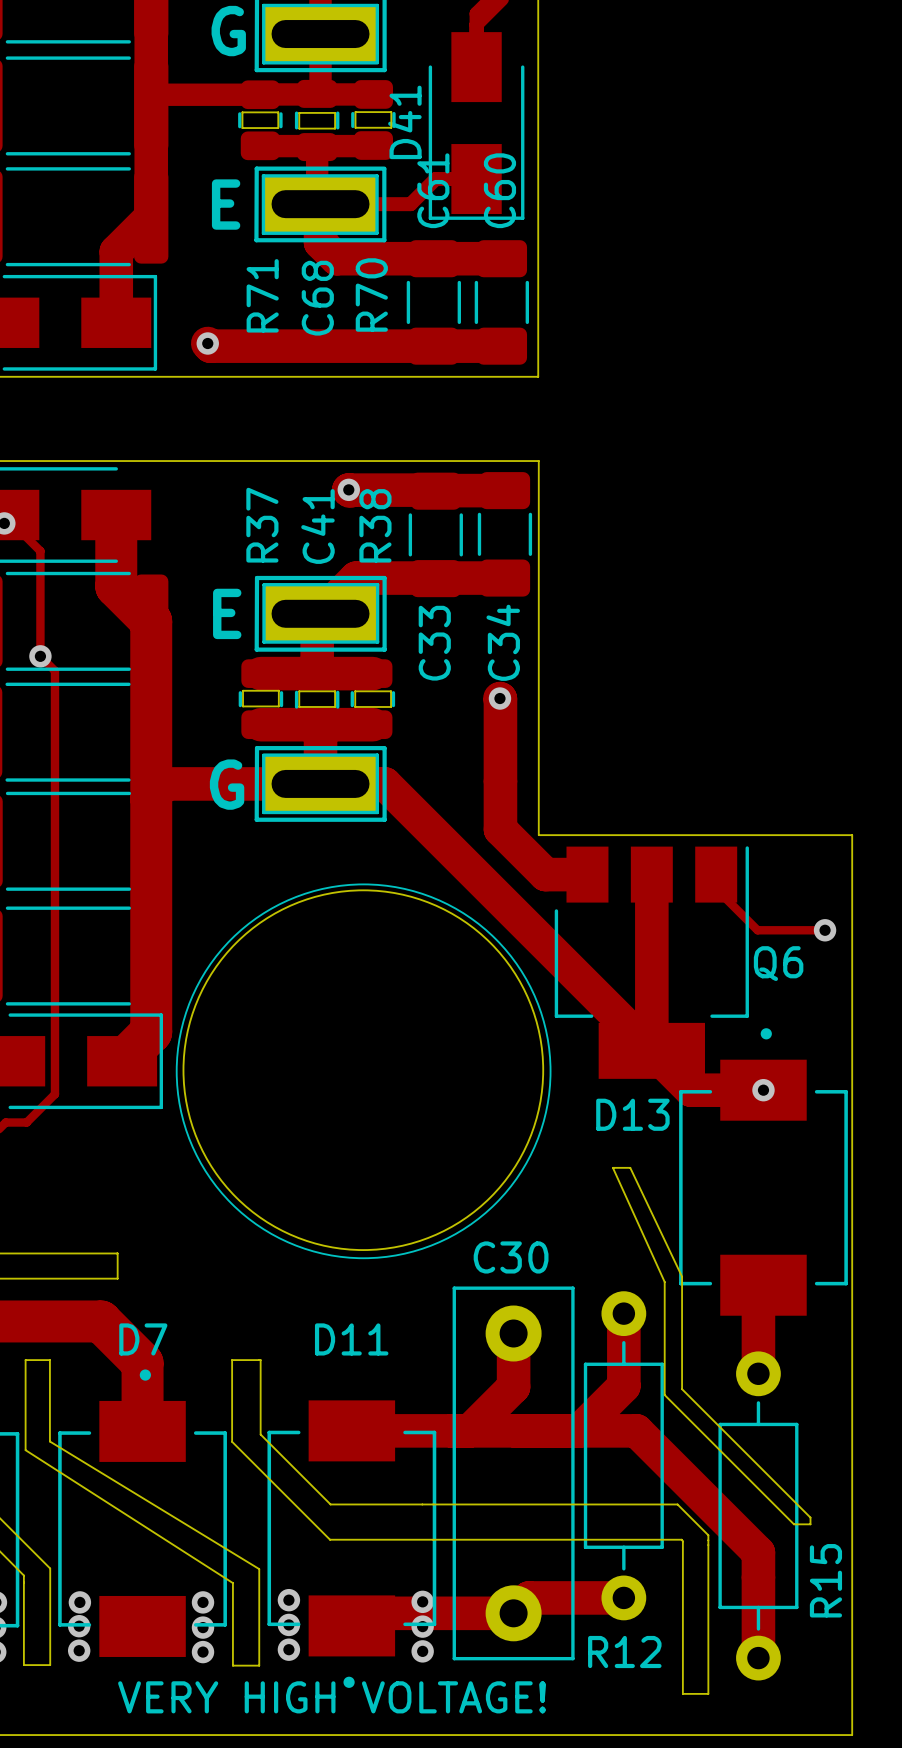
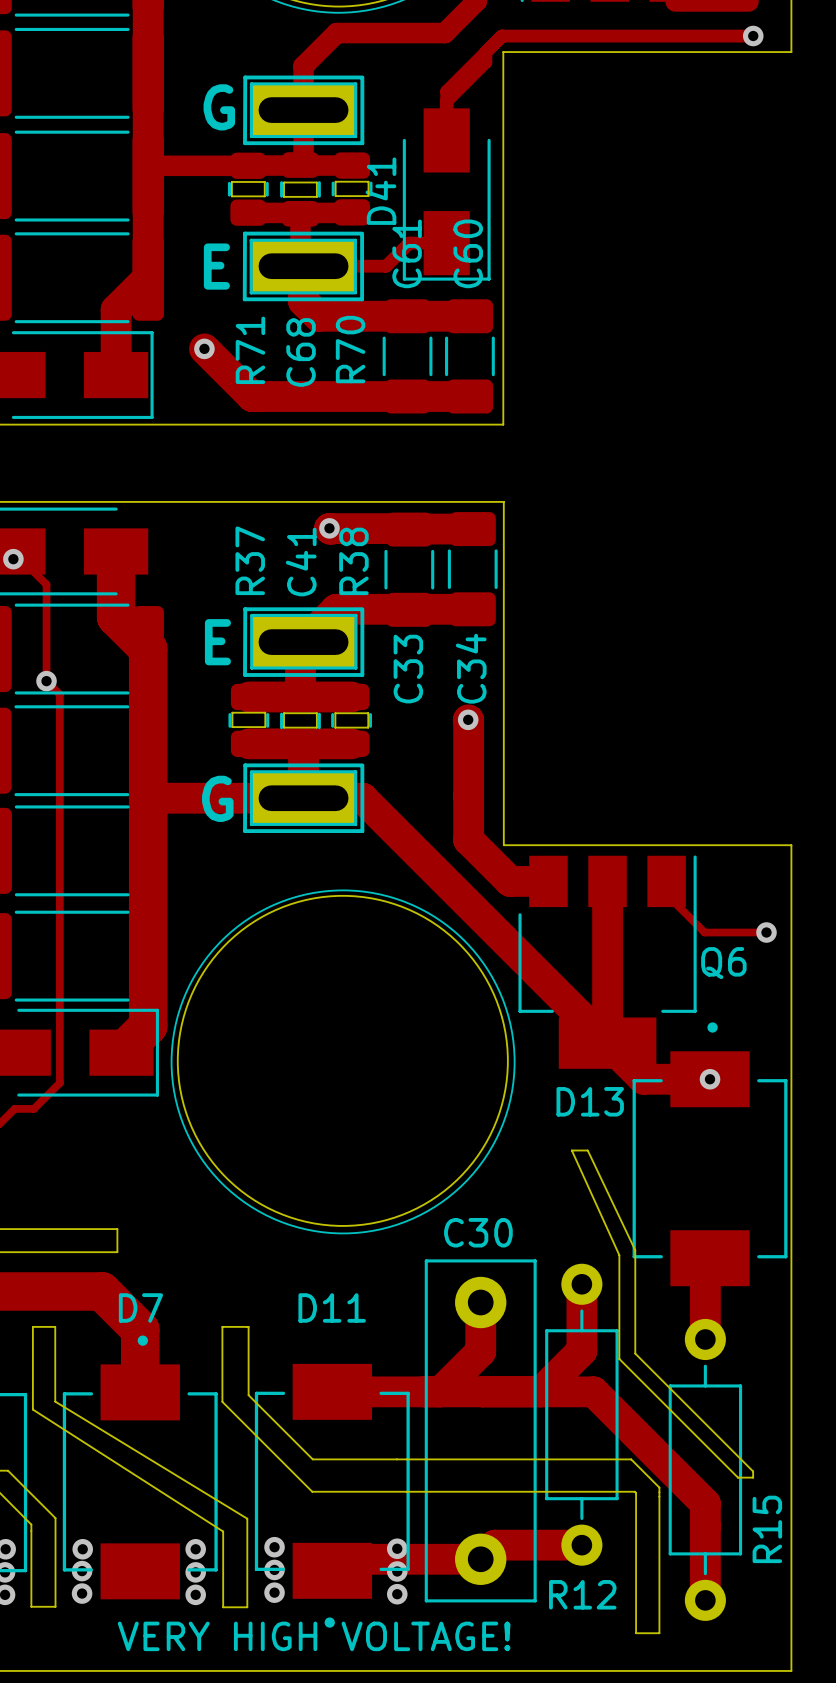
track: (207, 343) (210, 346) (264, 346) -> (204, 348) (252, 396)
via position: (207, 343) -> (204, 348)

